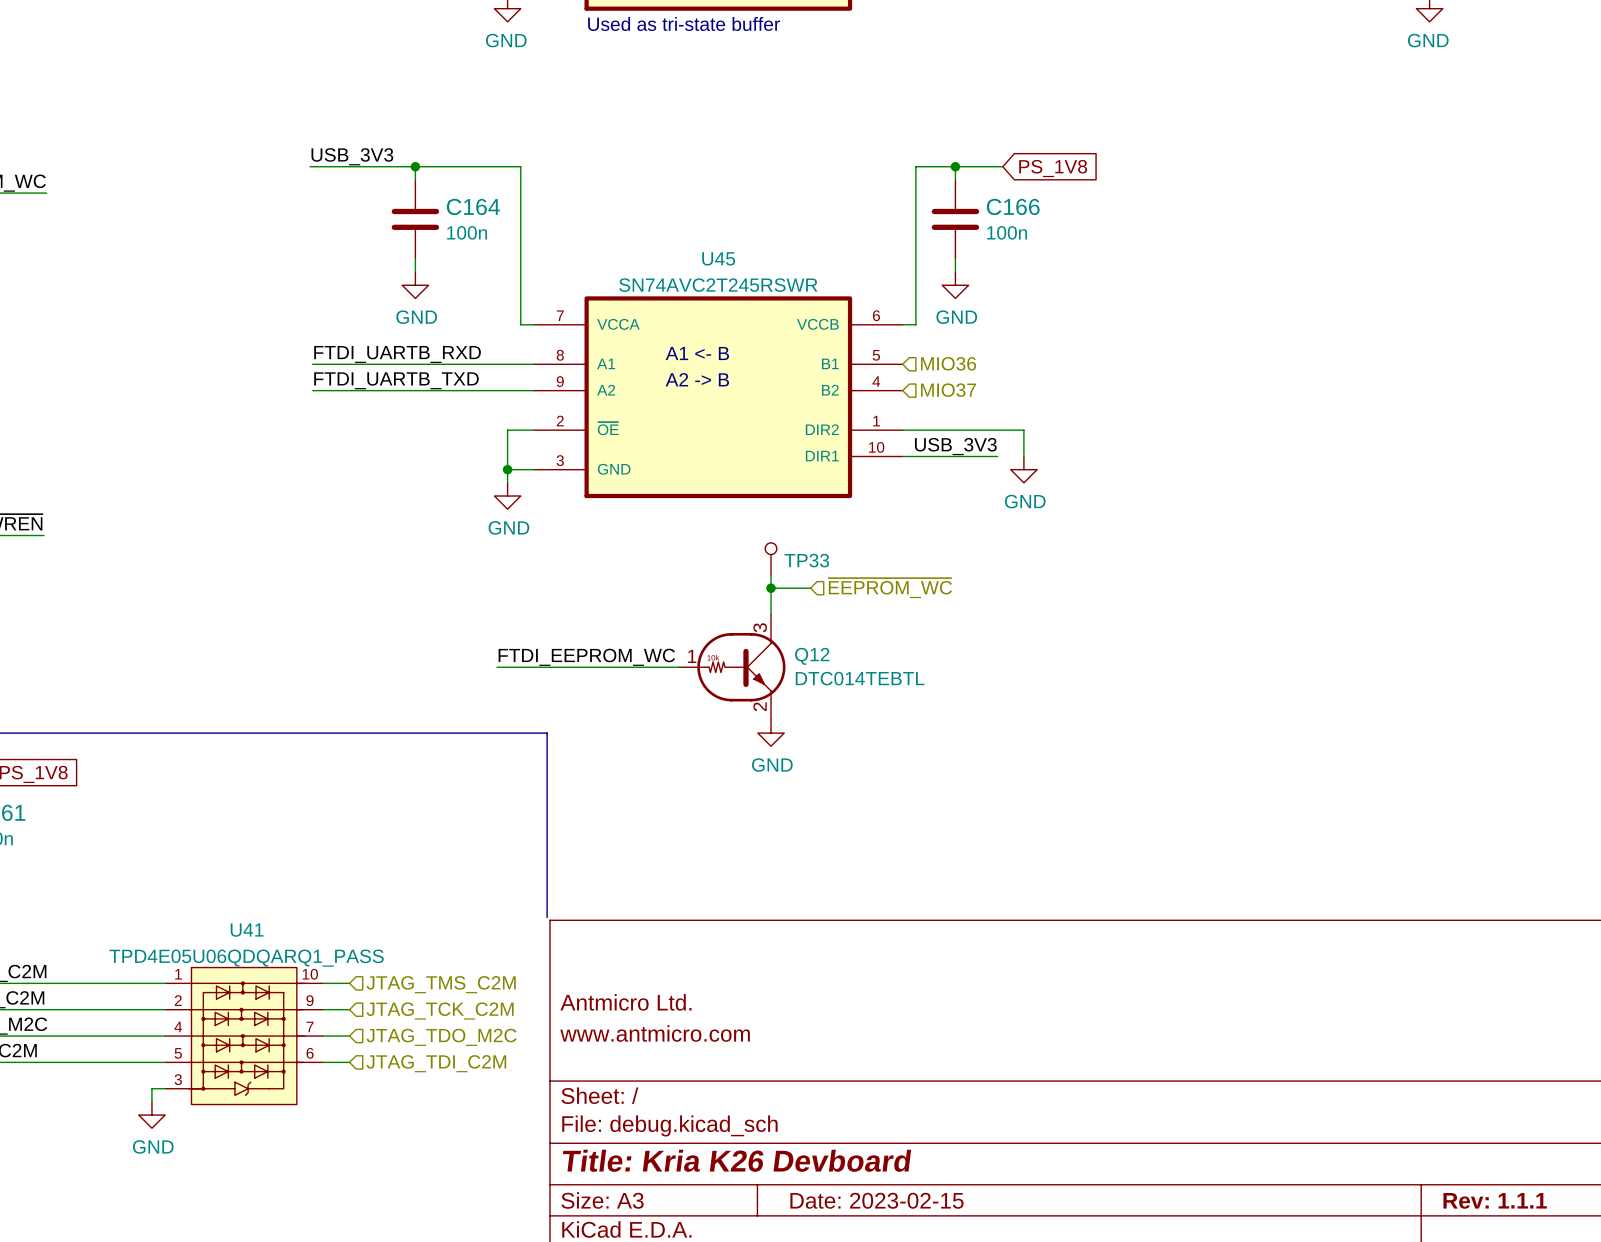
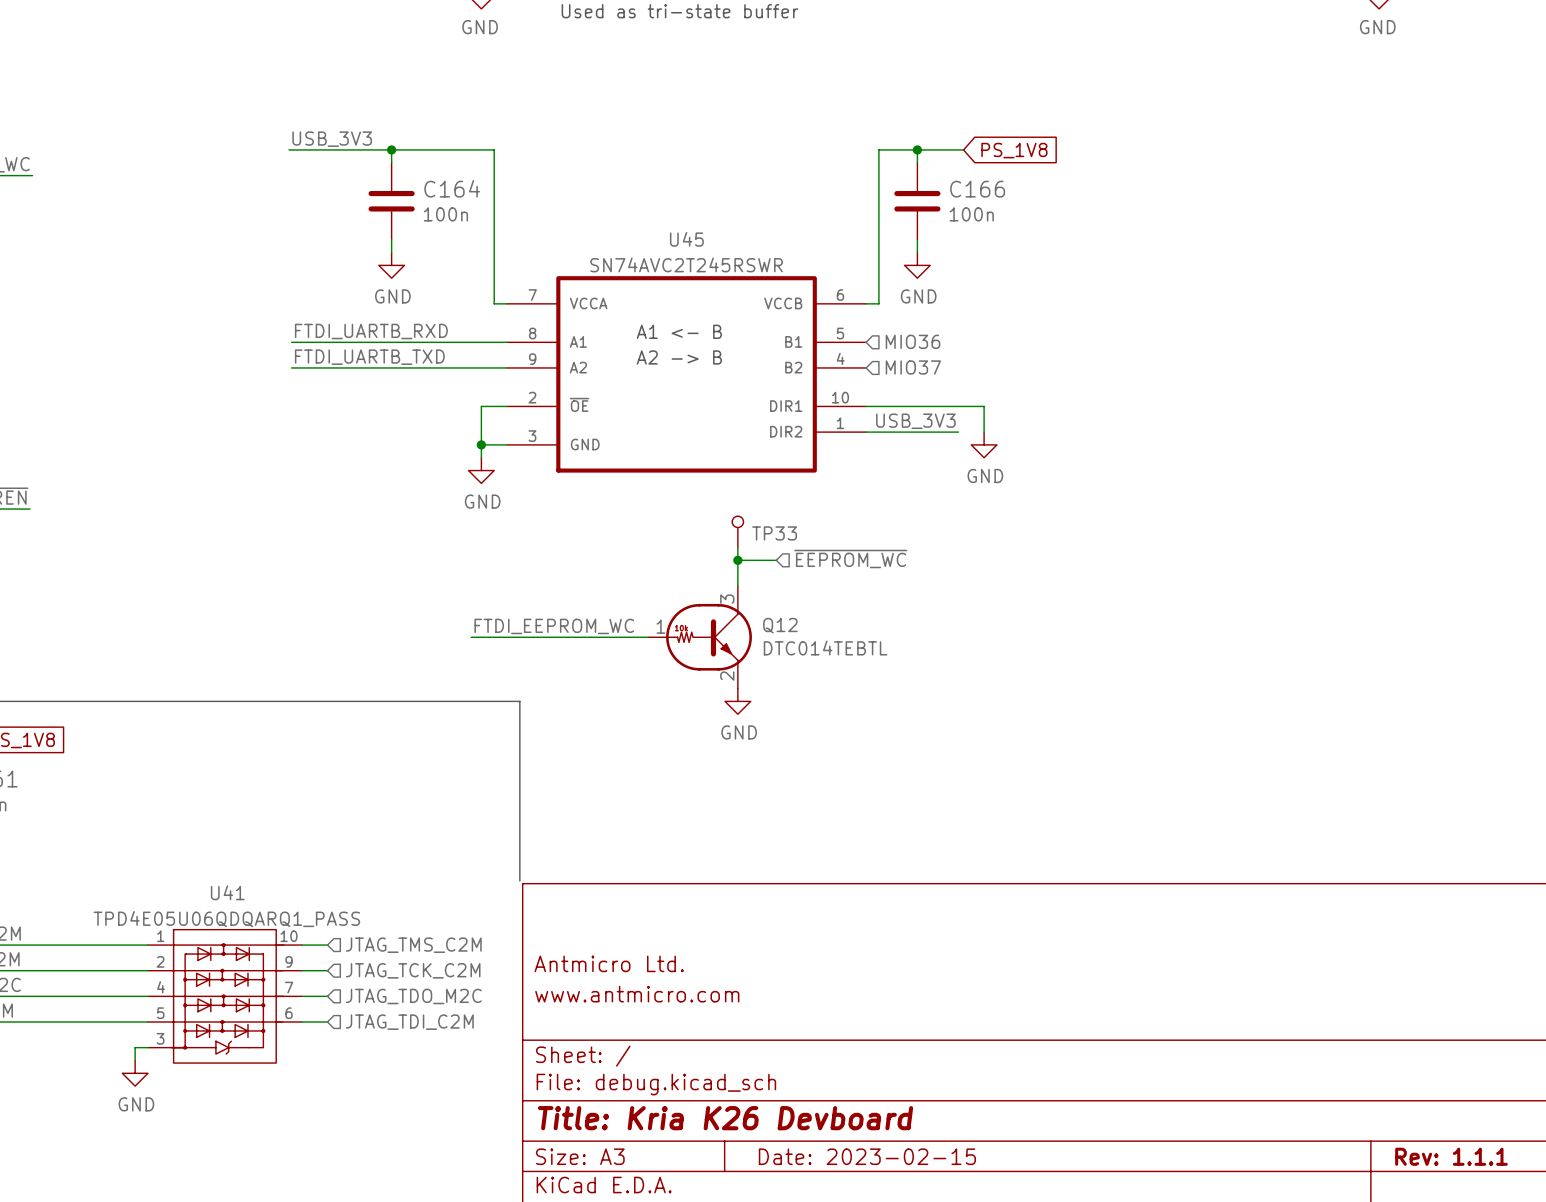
U45 pin number: 1 (876, 421) -> 10 (840, 397)
U45 pin name: DIR2 (822, 429) -> DIR1 (786, 406)
U45 pin number: 10 (876, 447) -> 1 (840, 423)
U45 pin name: DIR1 (822, 456) -> DIR2 (786, 431)

